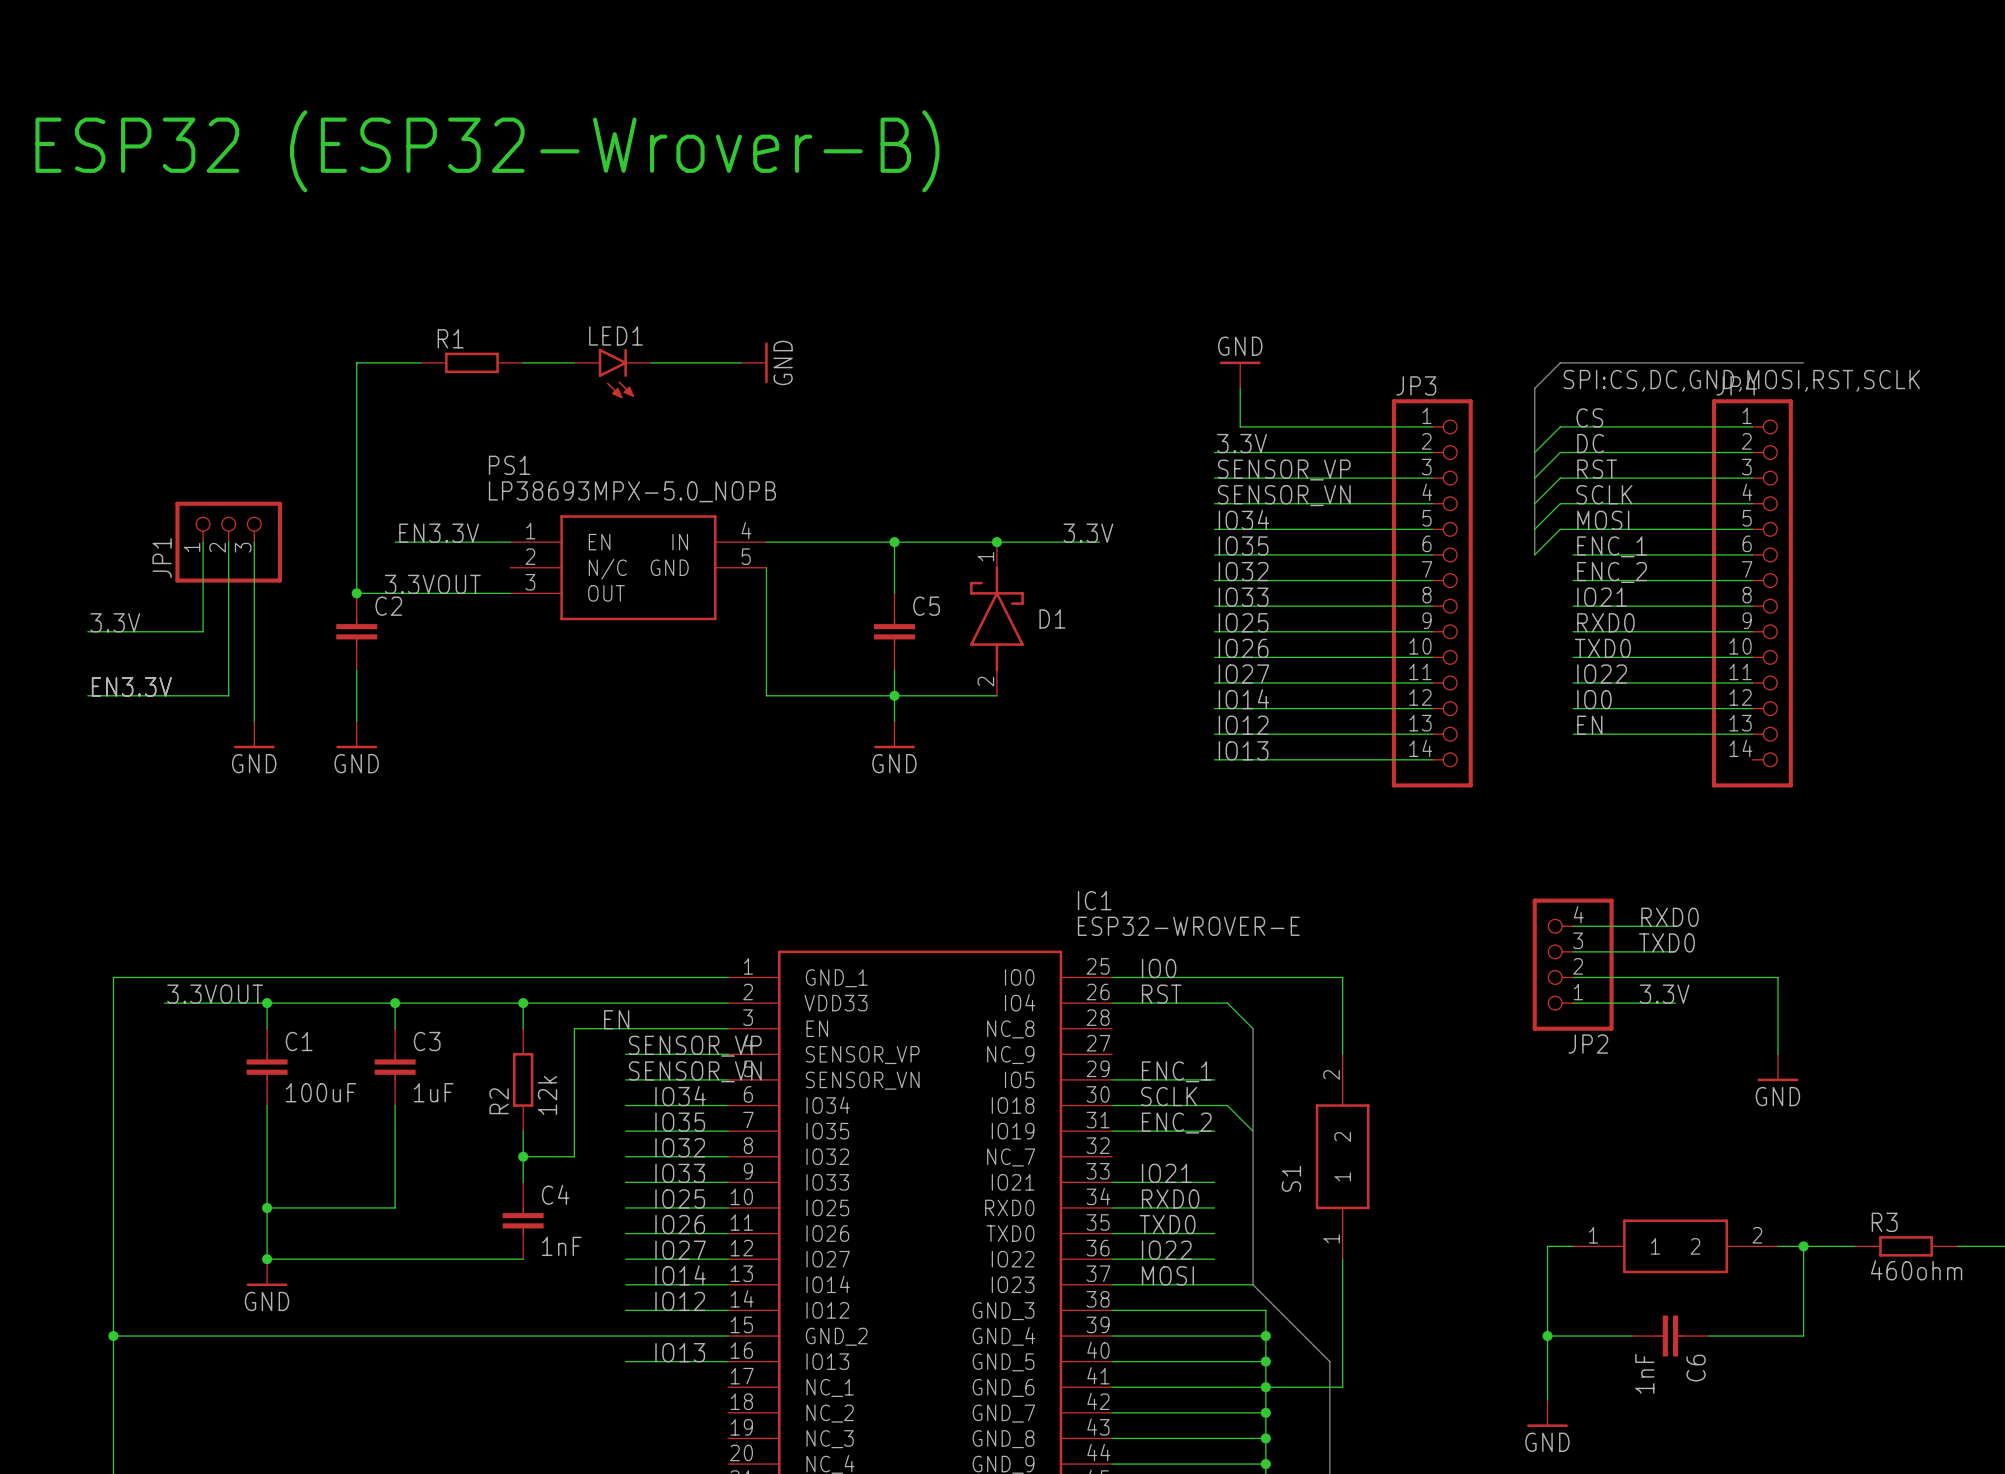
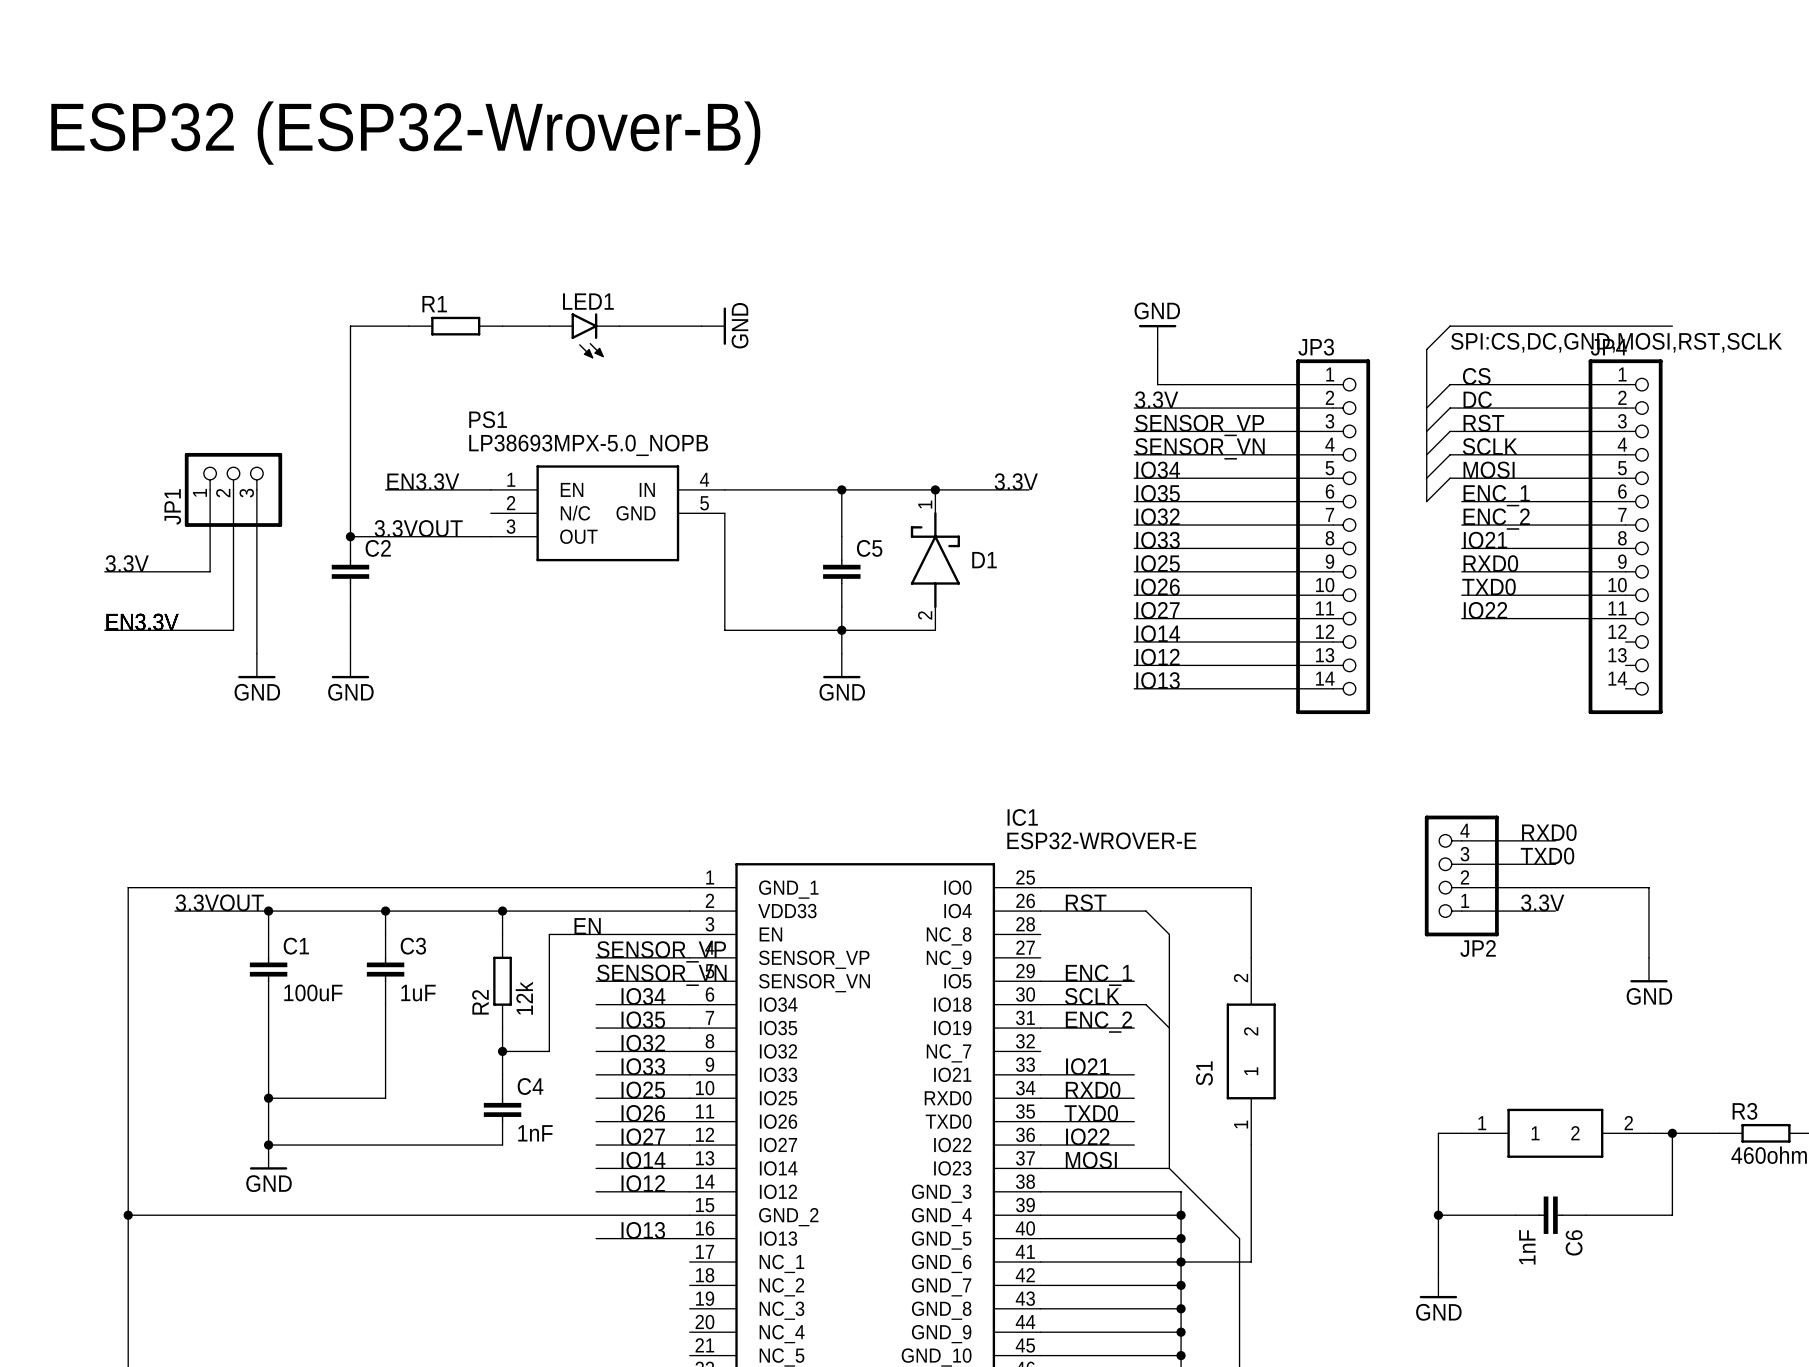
label: IO0 (1594, 699) -> none
wire: (1573, 708) (1752, 708) -> none
label: EN (1589, 725) -> none
wire: (1573, 734) (1752, 734) -> none
label: IO0 (1159, 968) -> none

